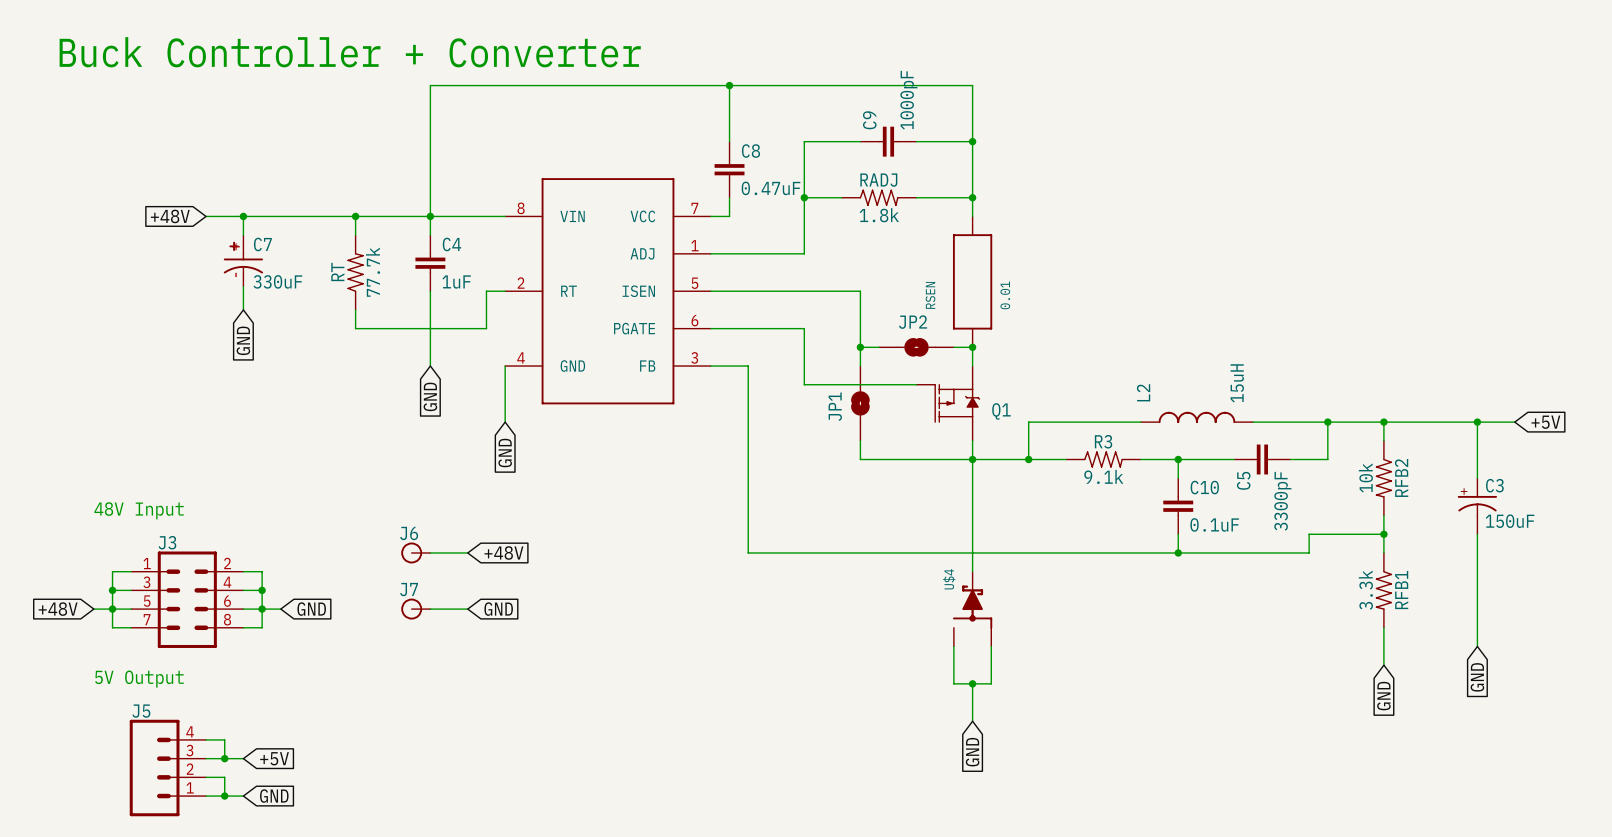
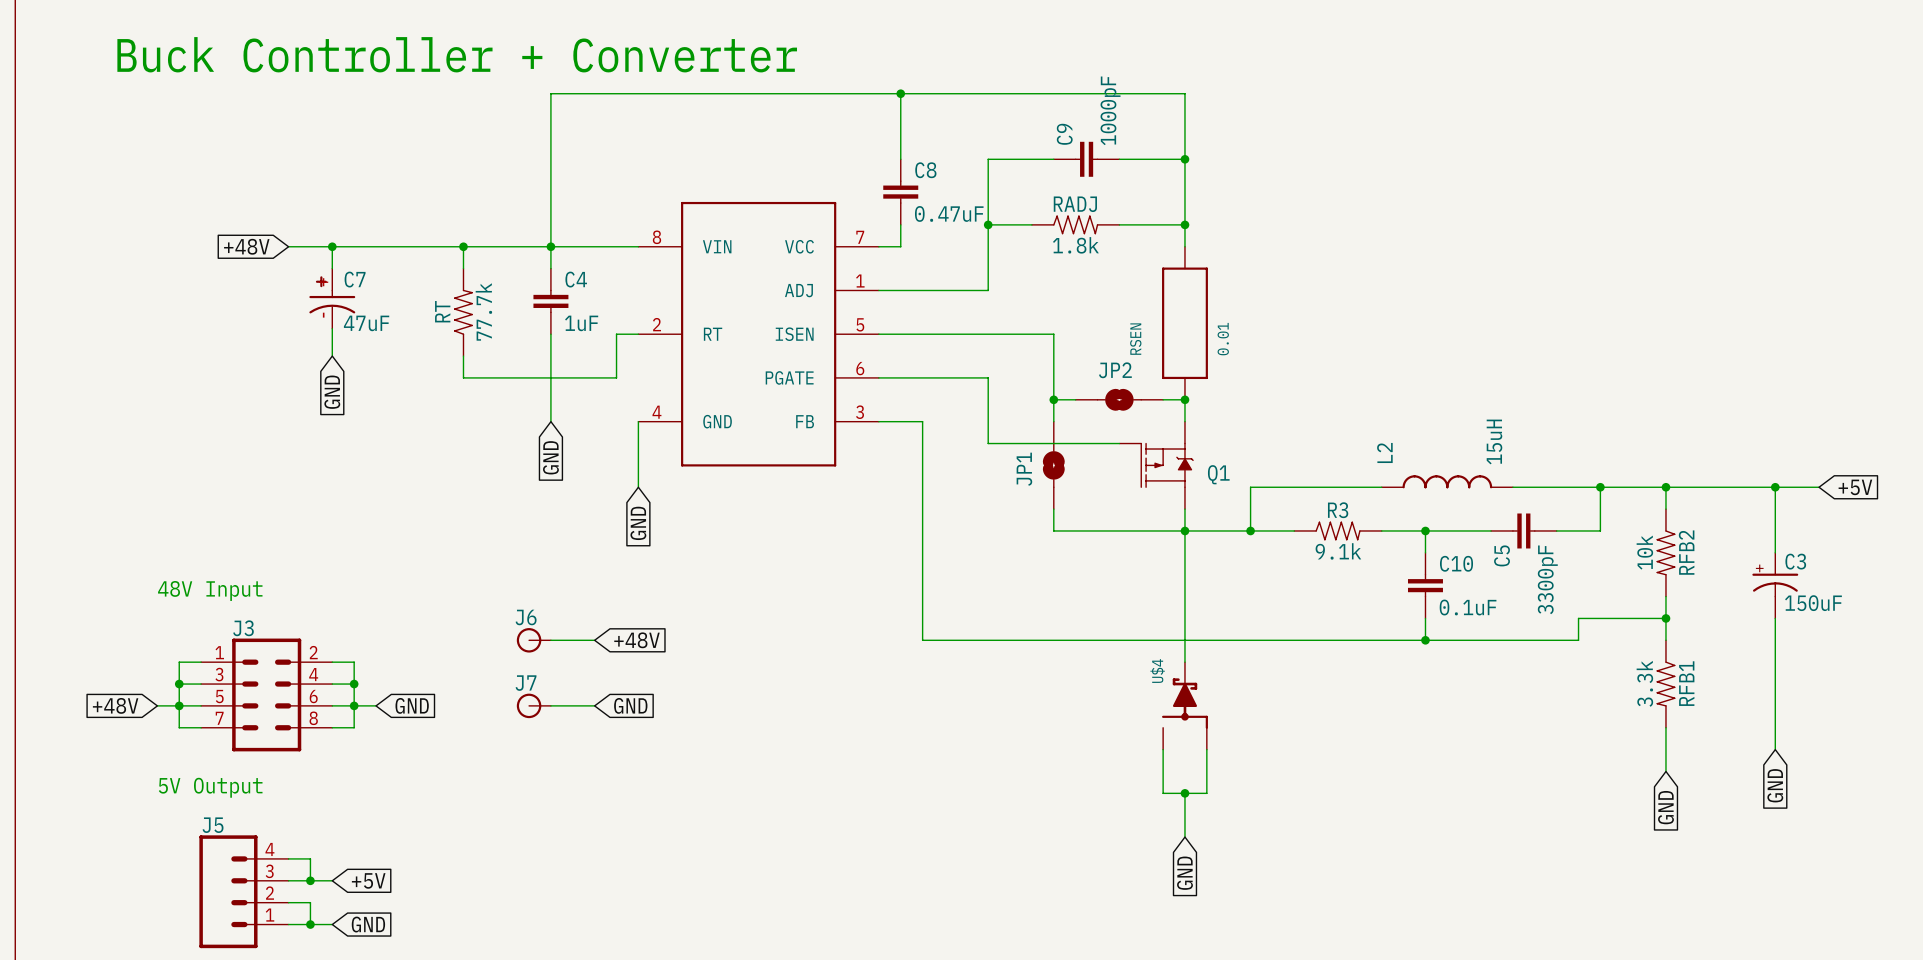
C7 value: 330uF (277, 281) -> 47uF (366, 323)

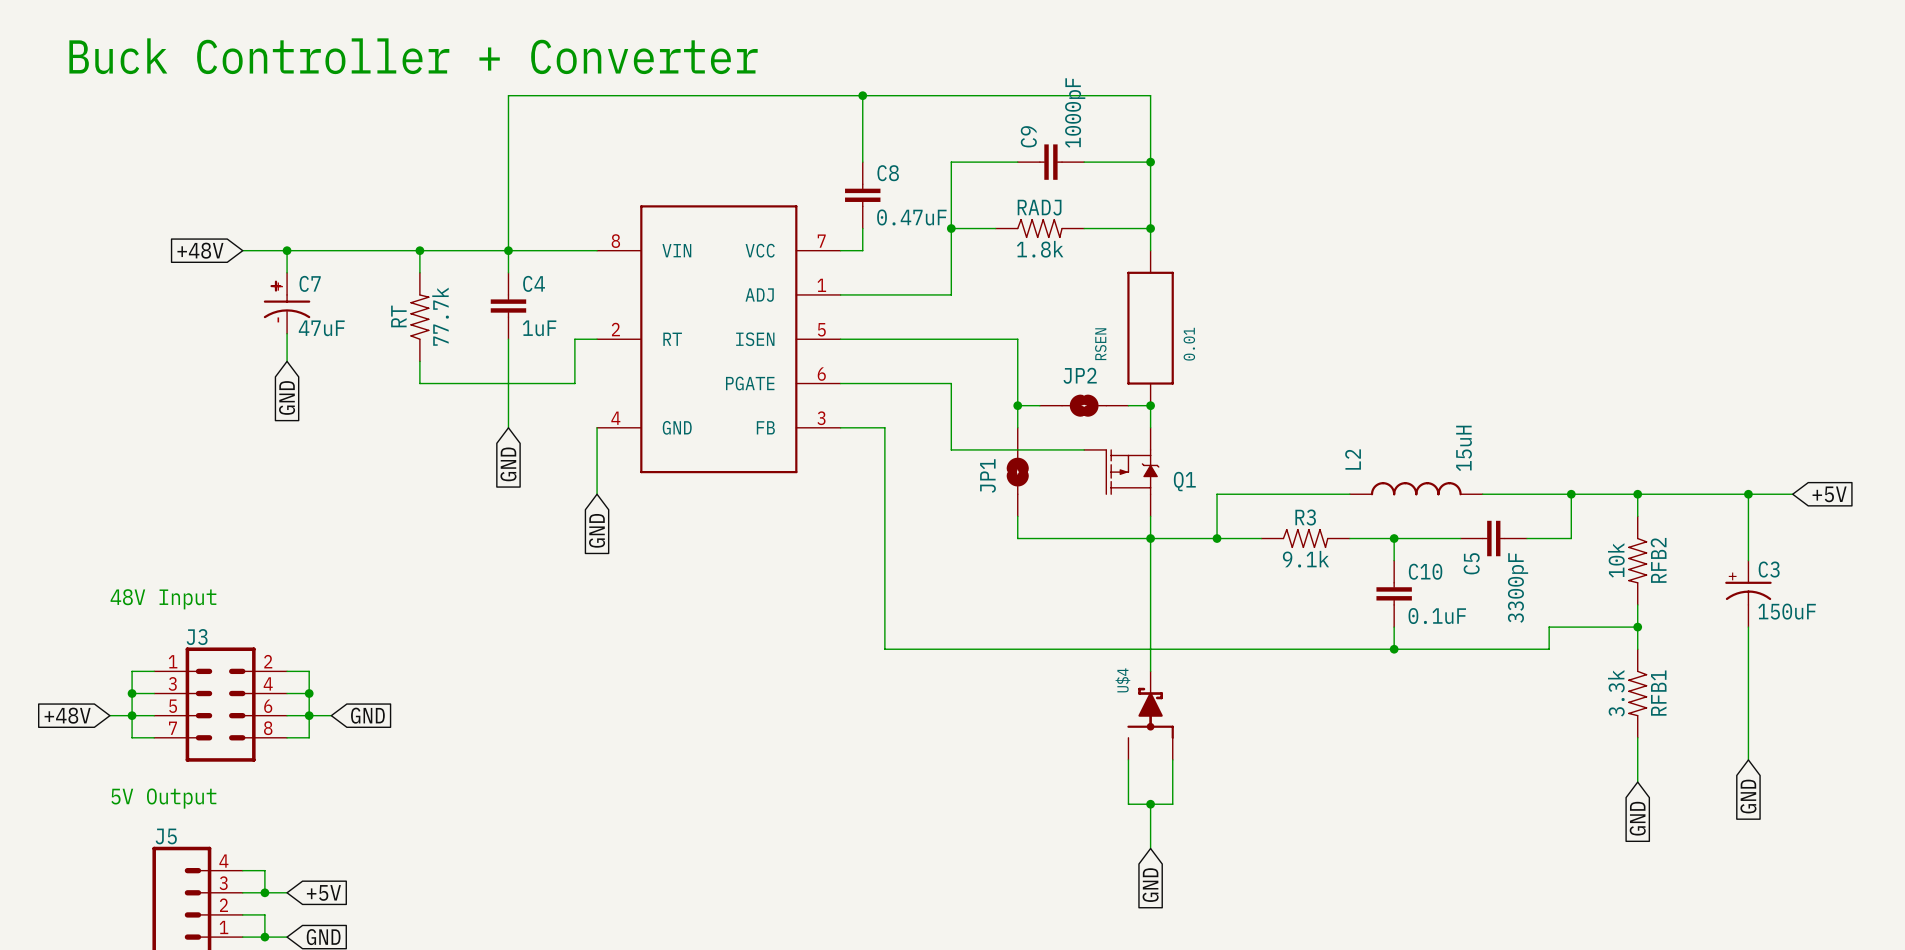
J6: (533, 640) -> none
wire: (550, 640) (594, 640) -> none
global label: +48V (636, 640) -> none
J7: (533, 705) -> none
wire: (550, 705) (594, 705) -> none
global label: GND (630, 705) -> none

